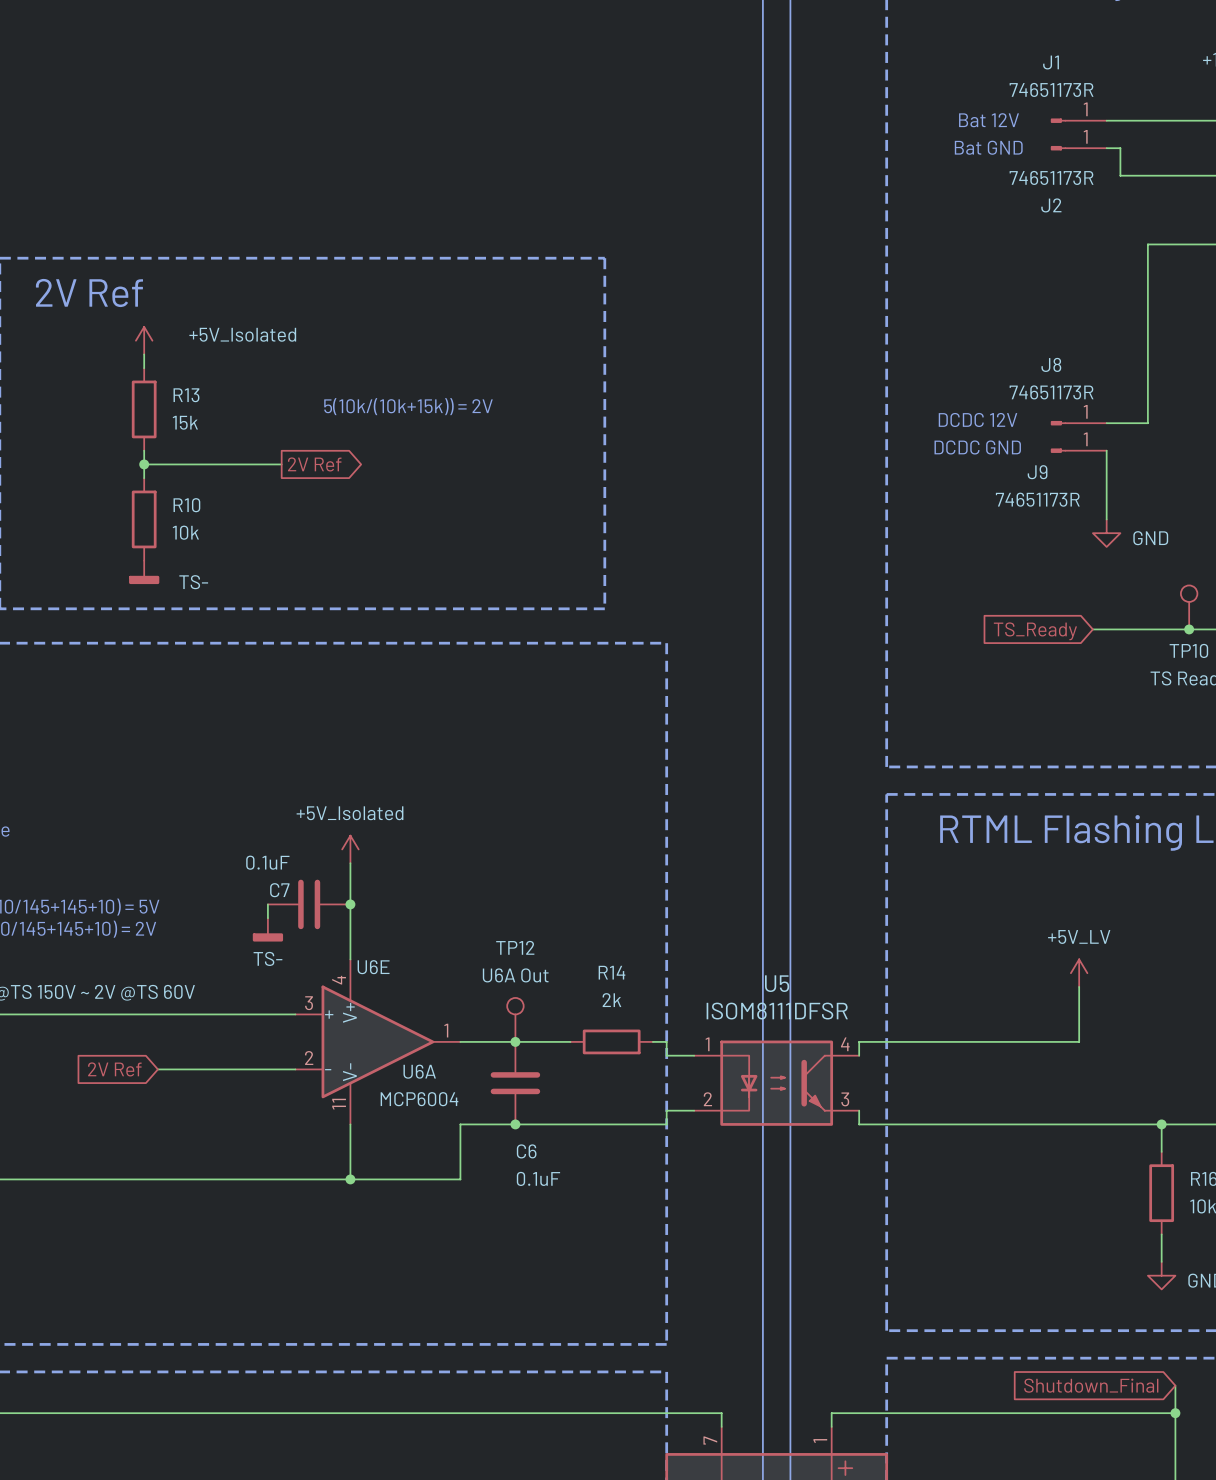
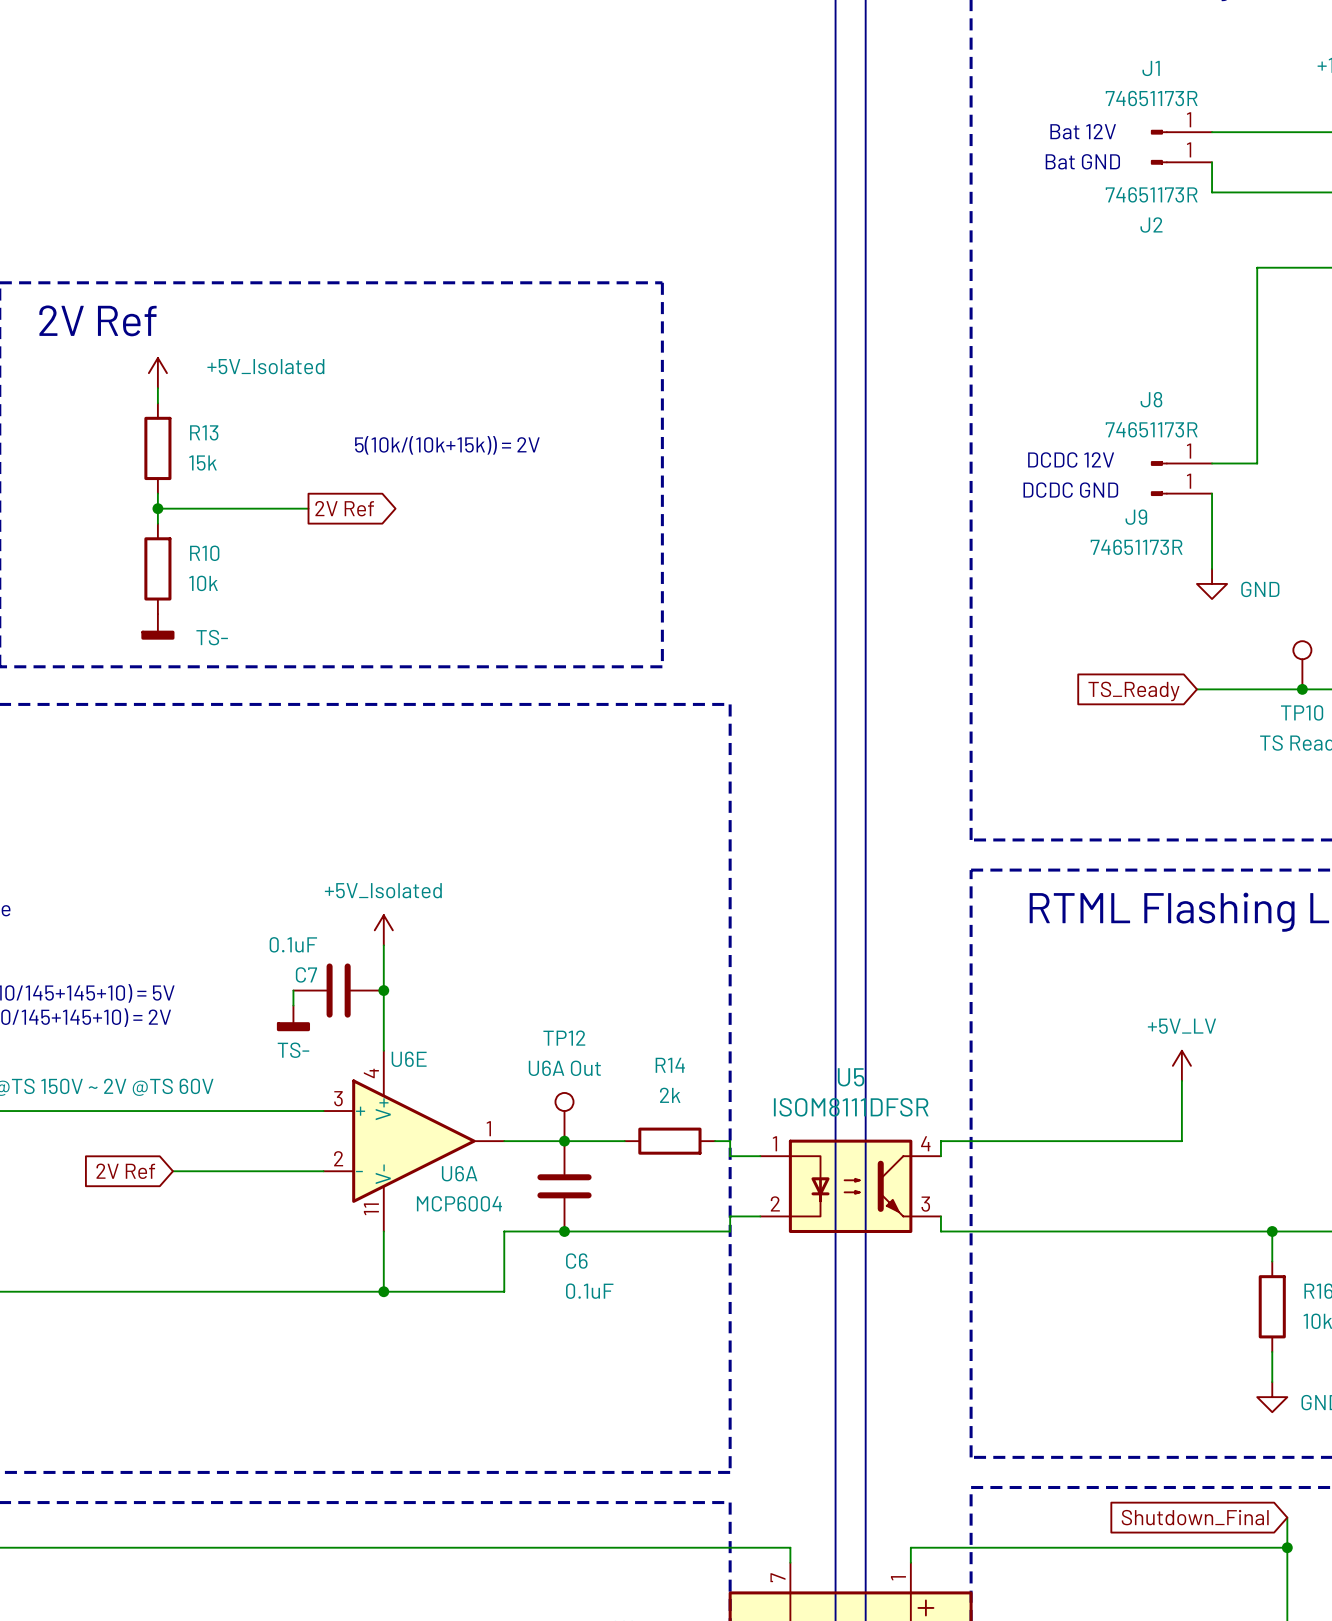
wire: (1106, 148) (1120, 148) (1120, 175) -> (1212, 162) (1212, 192) (1227, 192)

